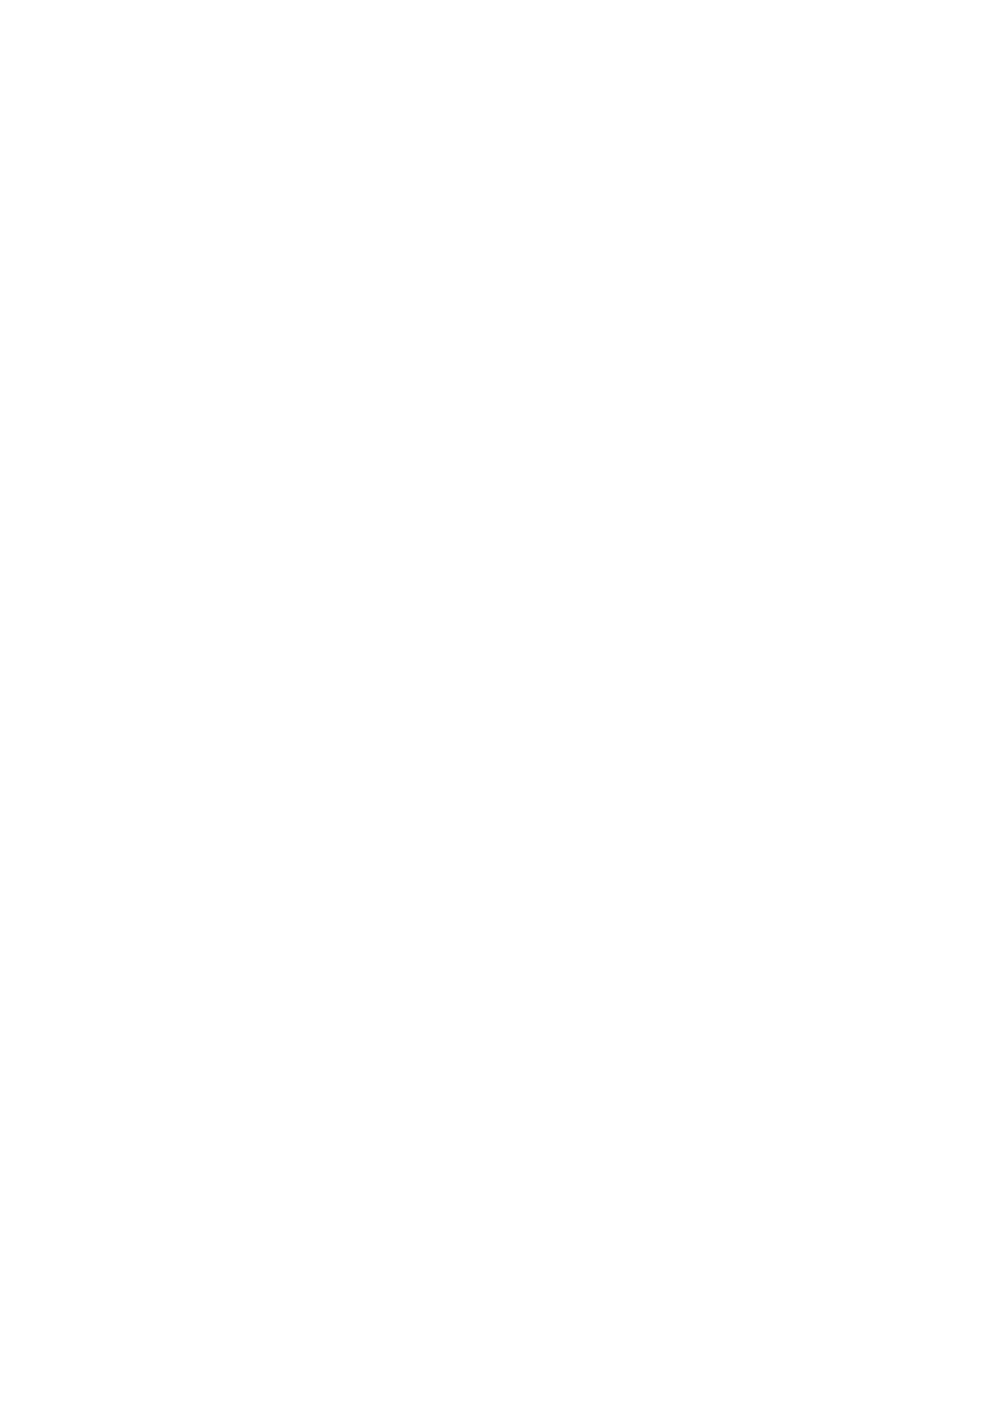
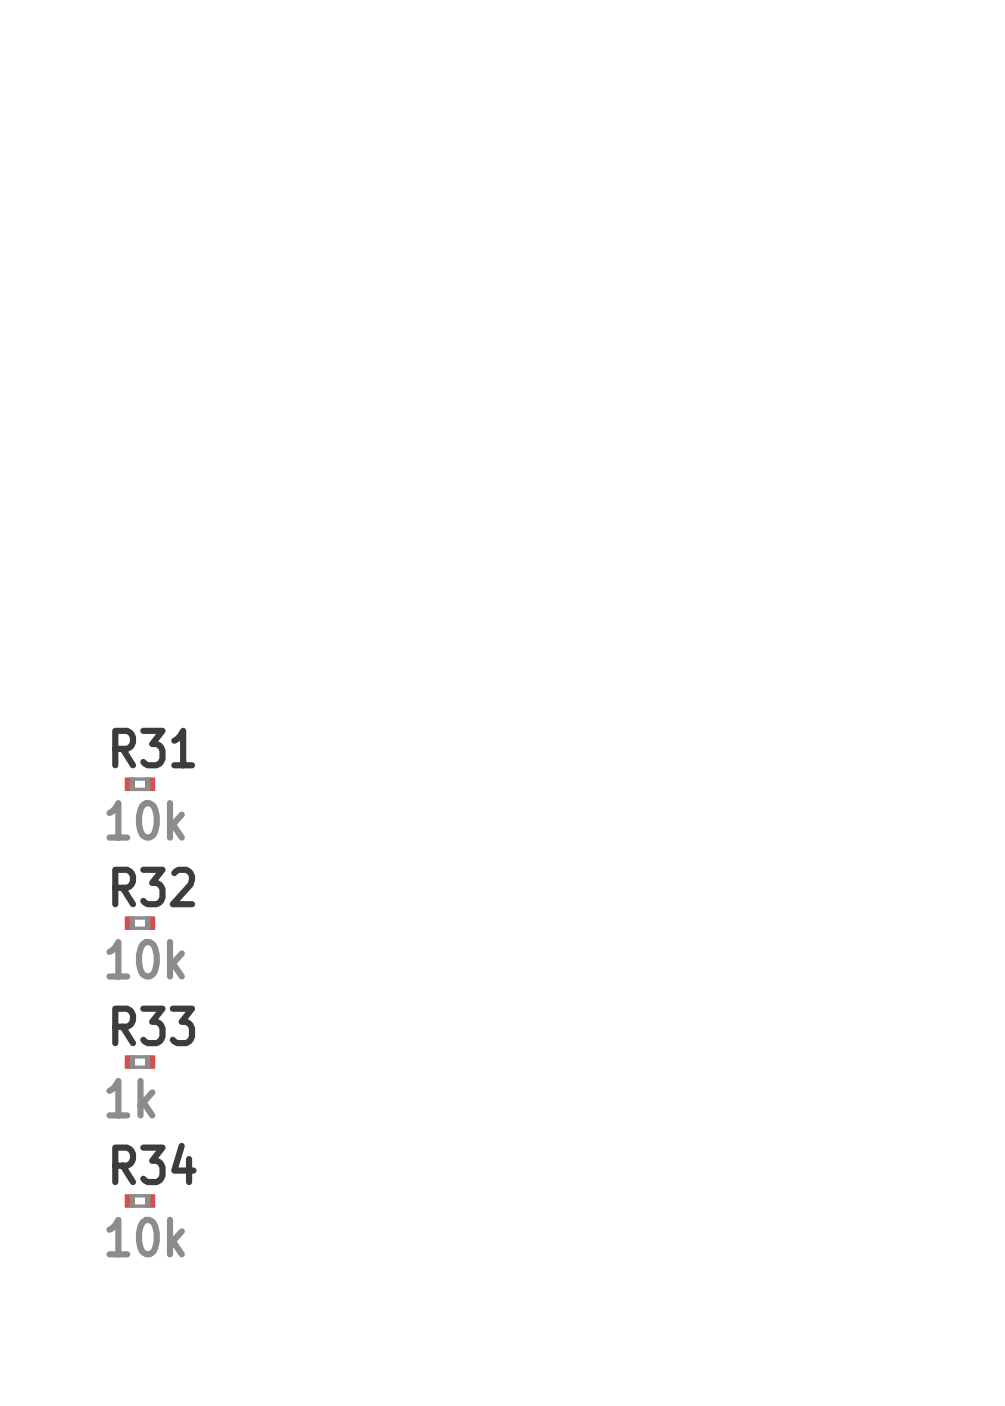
R31: none -> 10k (139, 784)
R32: none -> 10k (139, 923)
R33: none -> 1k (139, 1062)
R34: none -> 10k (139, 1200)

